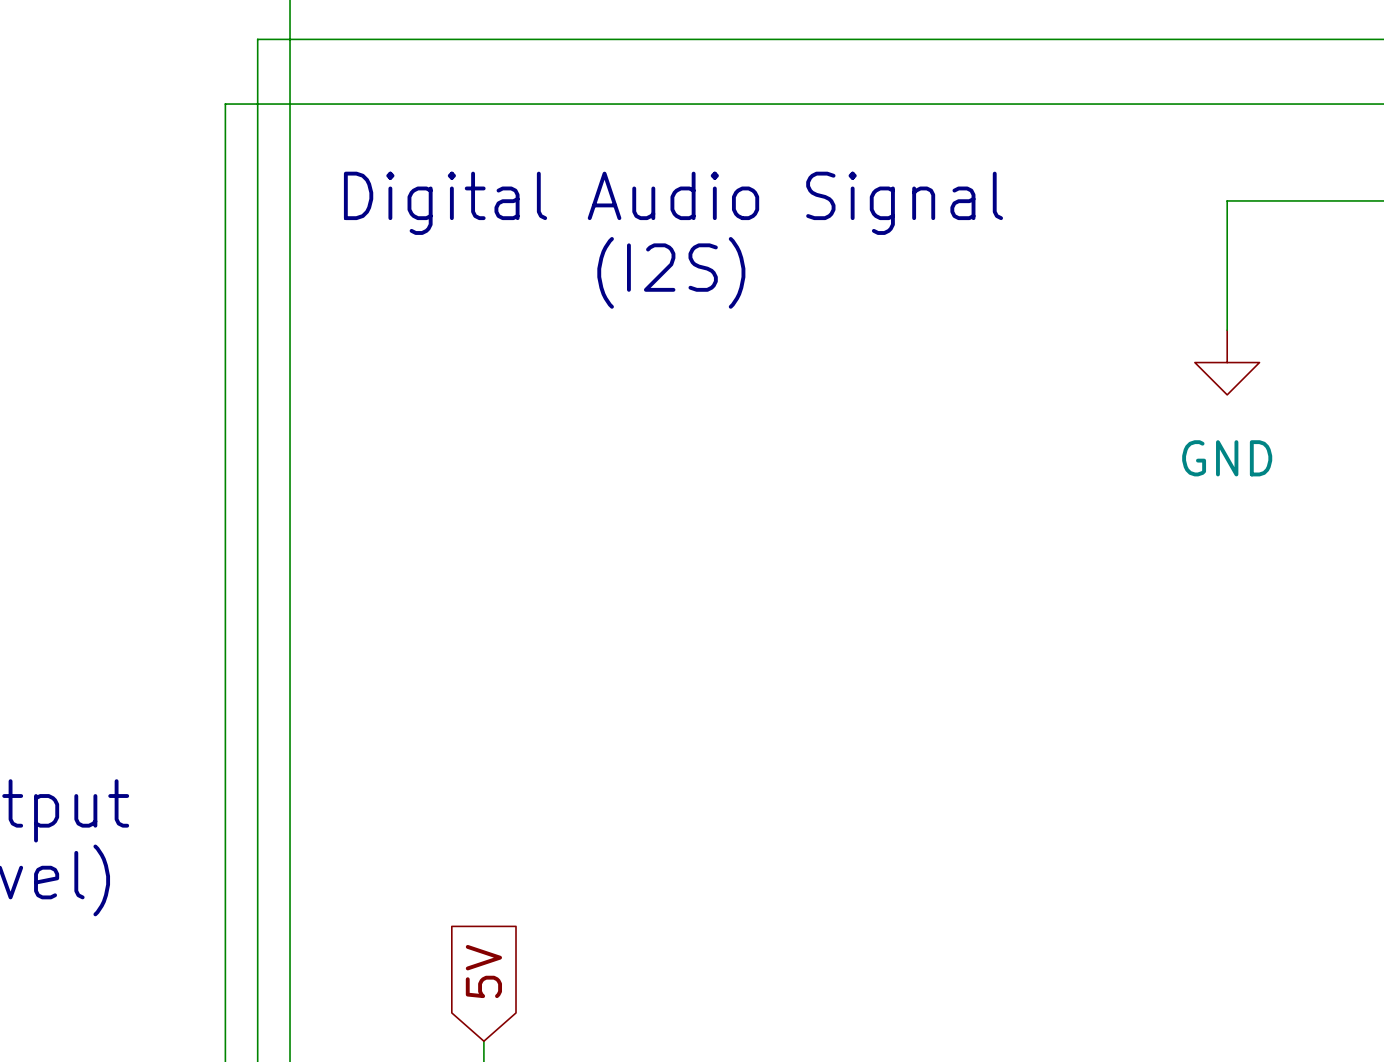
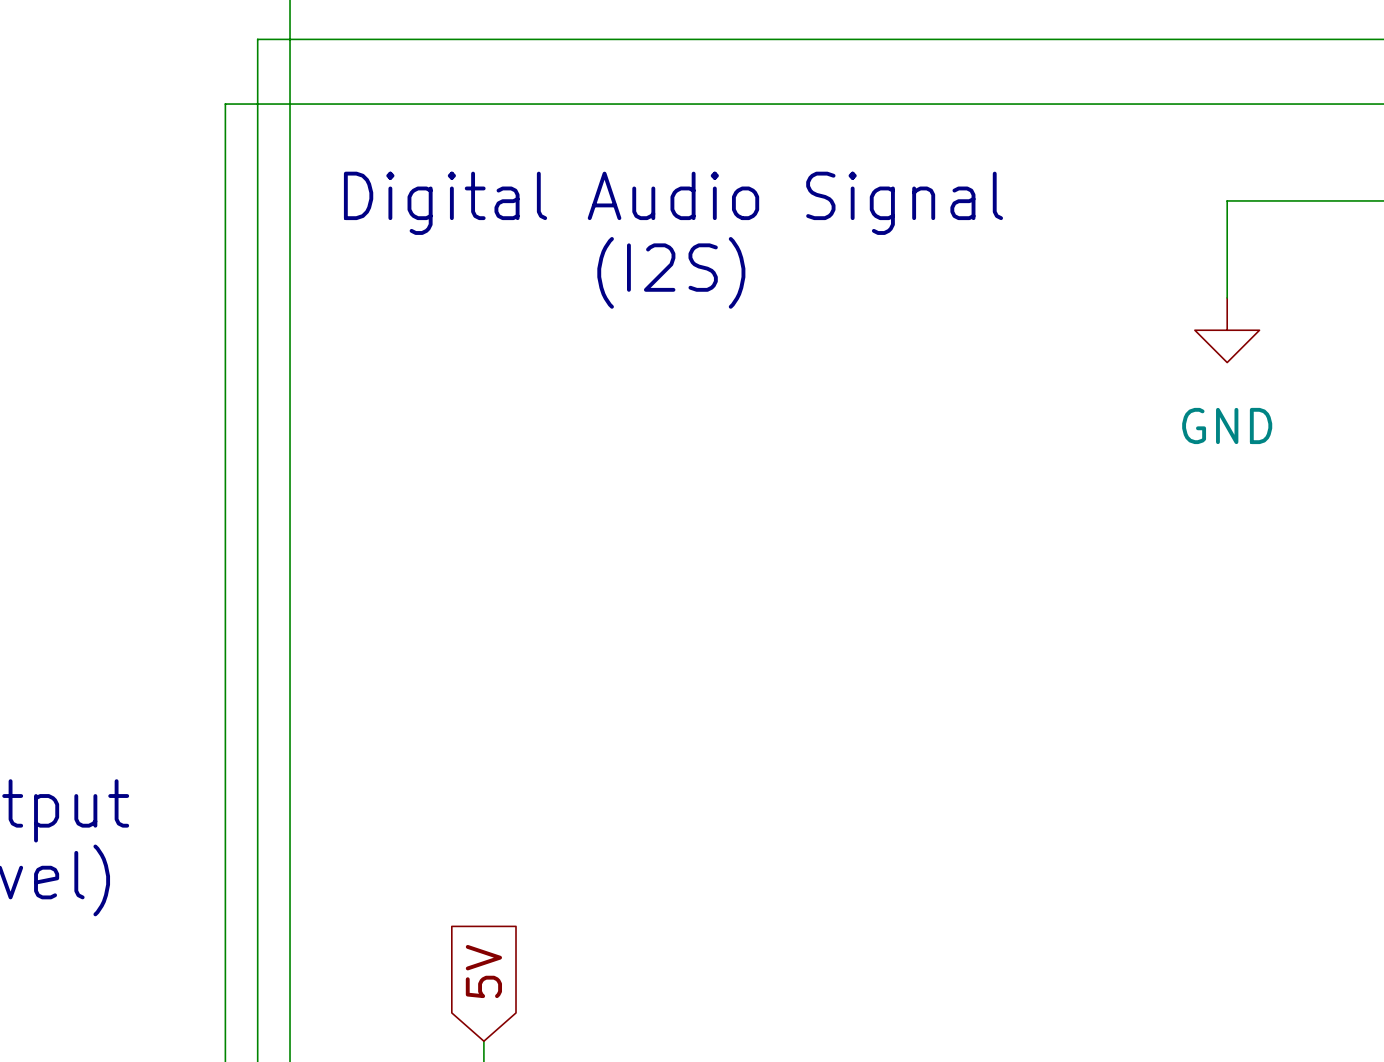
power symbol position: GND (1227, 362) -> GND (1227, 330)

